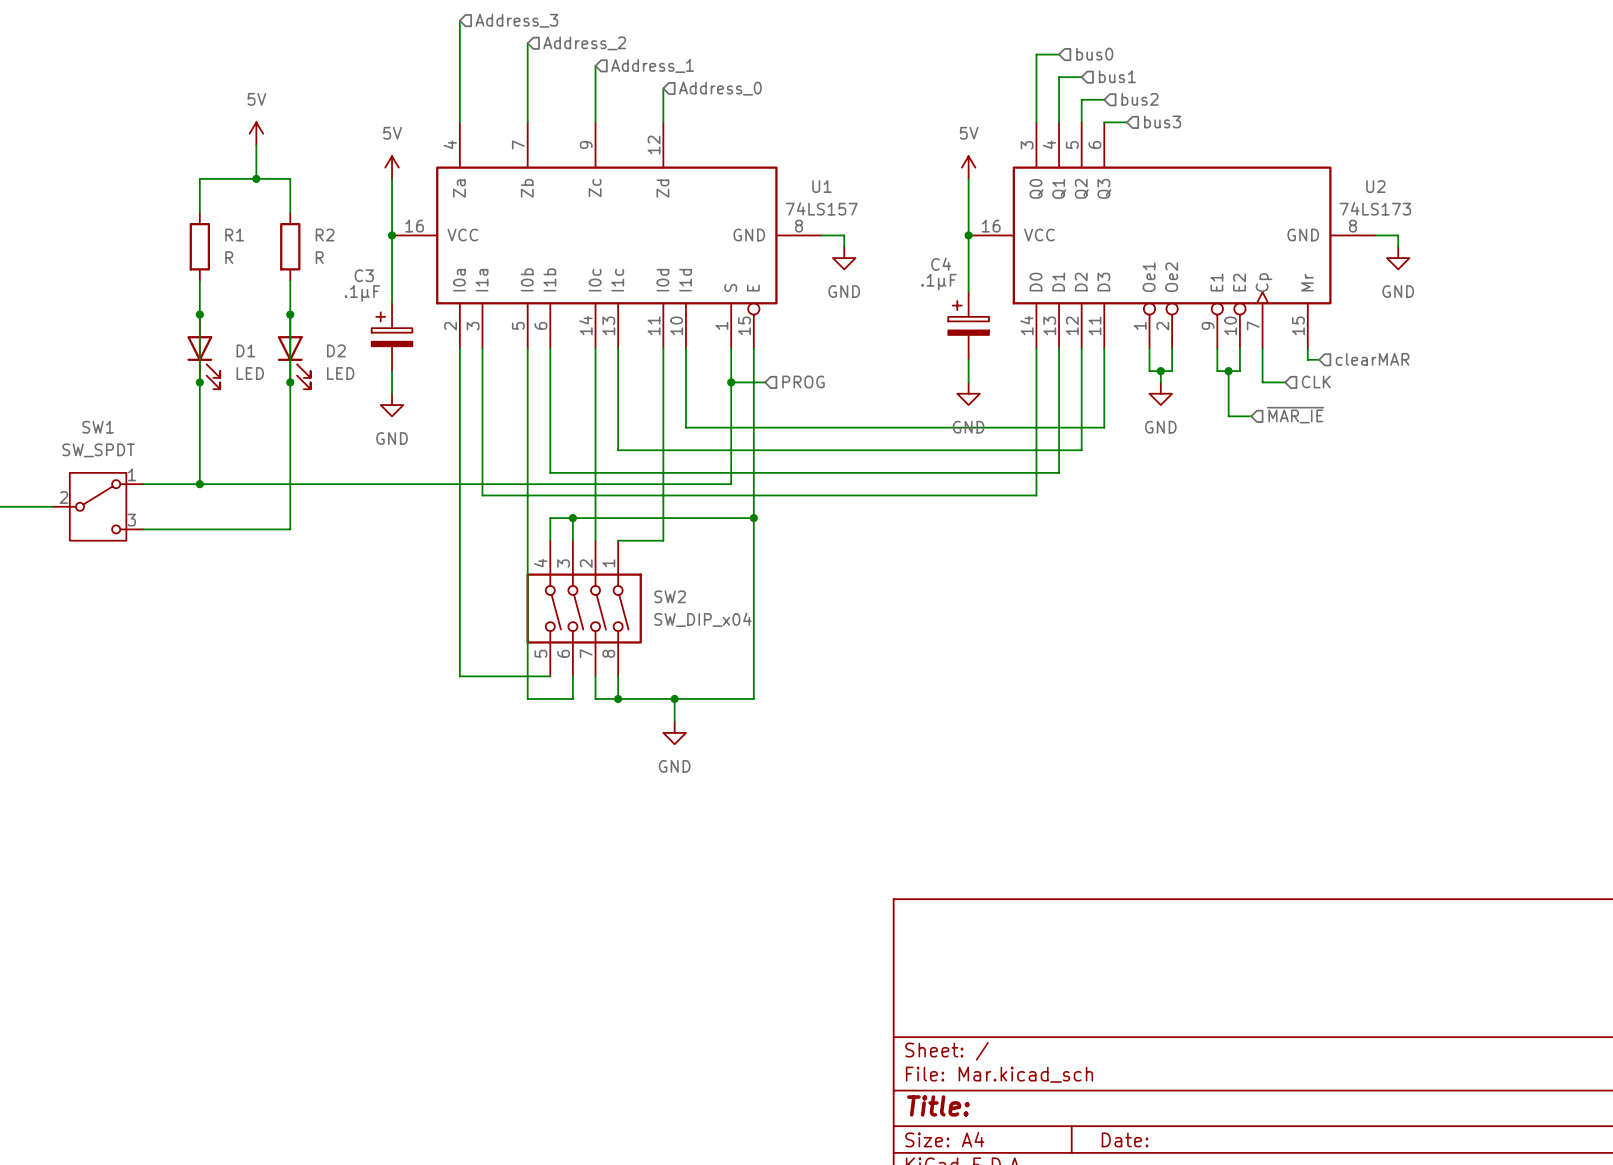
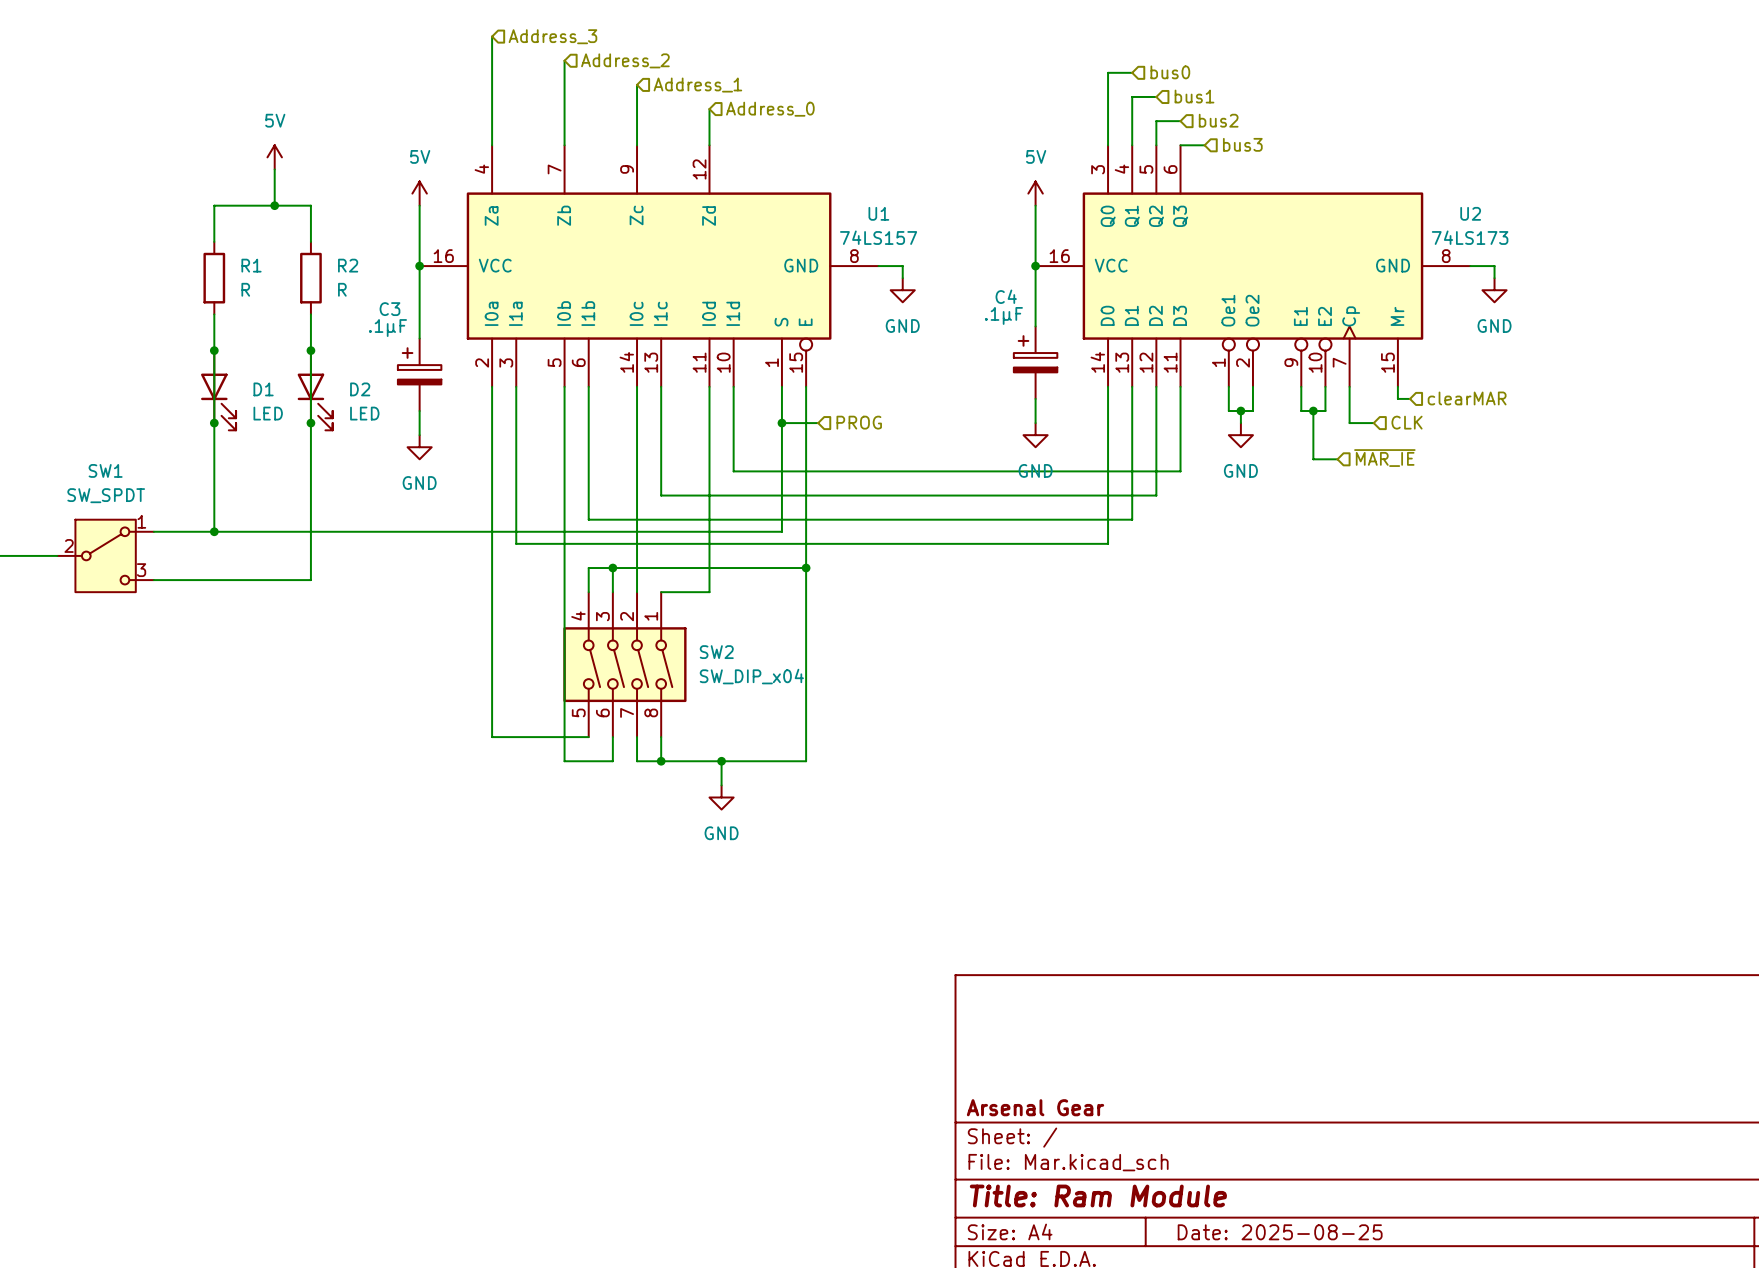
title block: none -> Arsenal Gear (1035, 1107)
title block: Title: (938, 1105) -> Title: Ram Module (1098, 1195)
title block: Date: (1125, 1139) -> Date: 2025-08-25 (1280, 1232)

